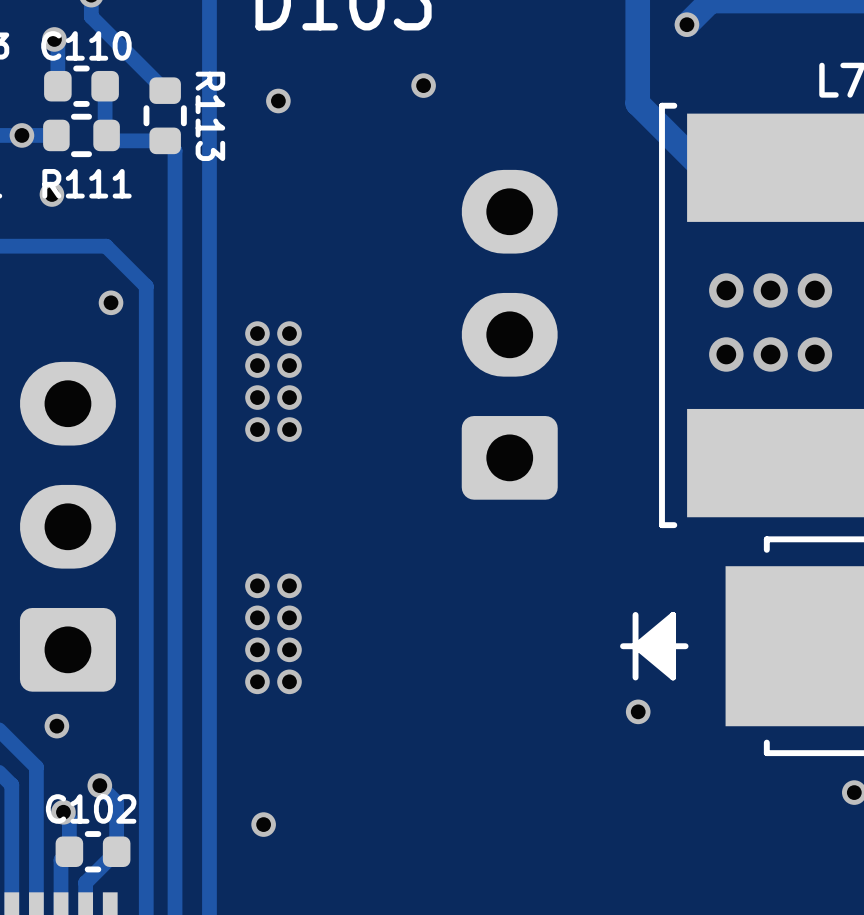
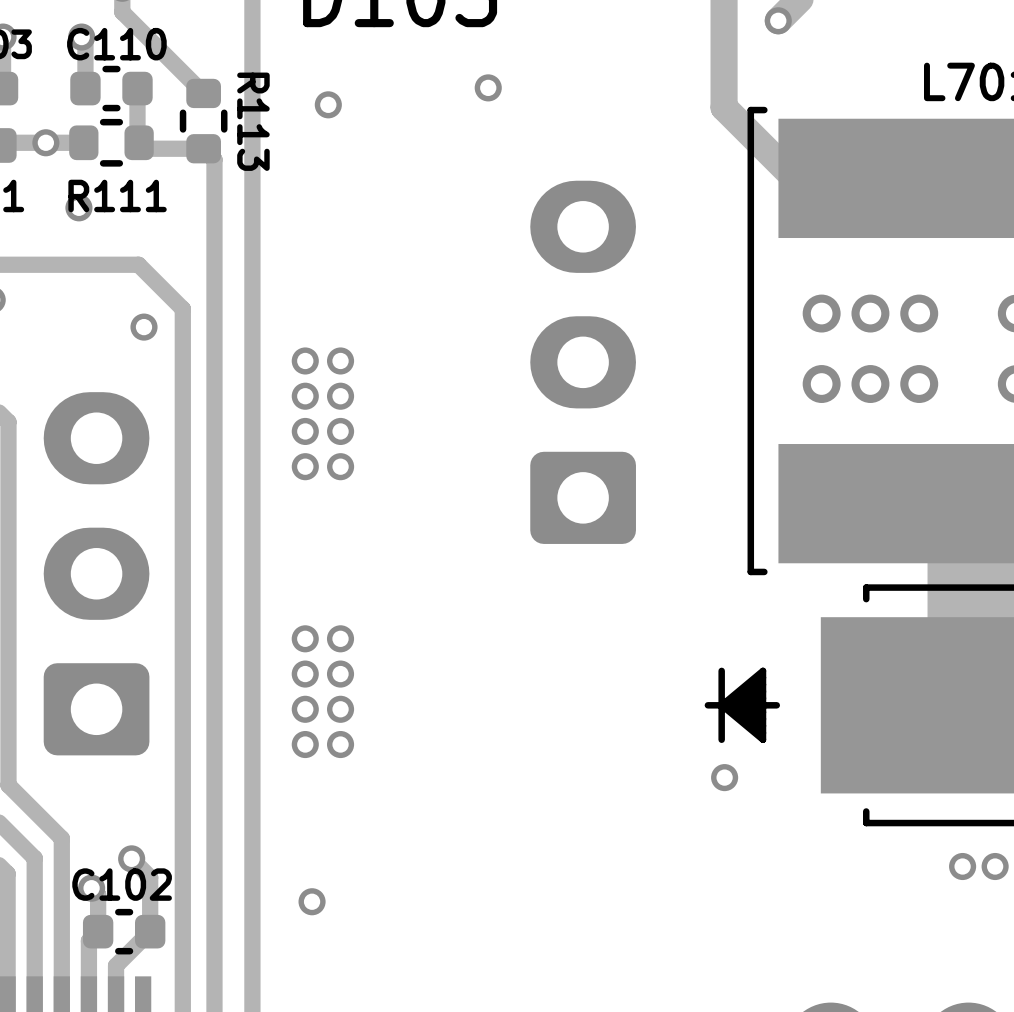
via: (56, 726) -> none

